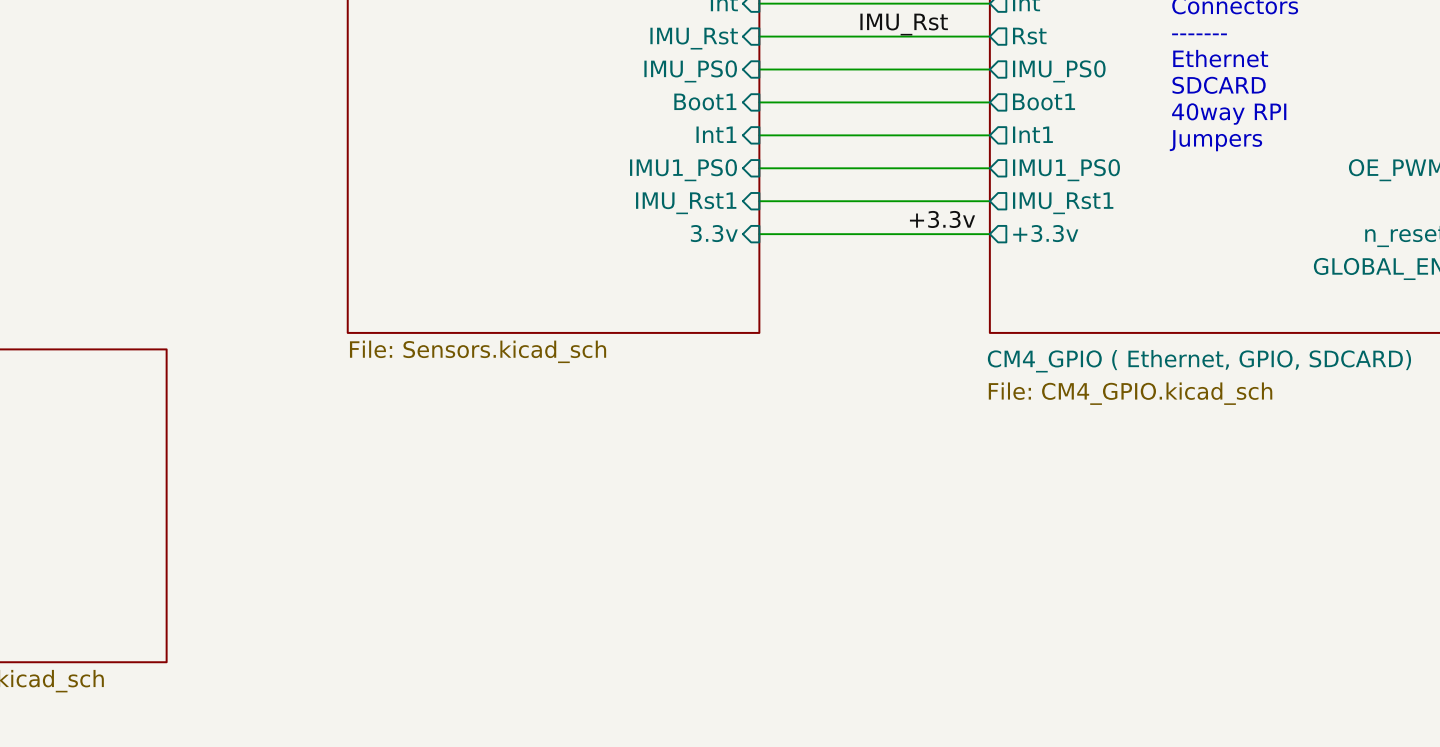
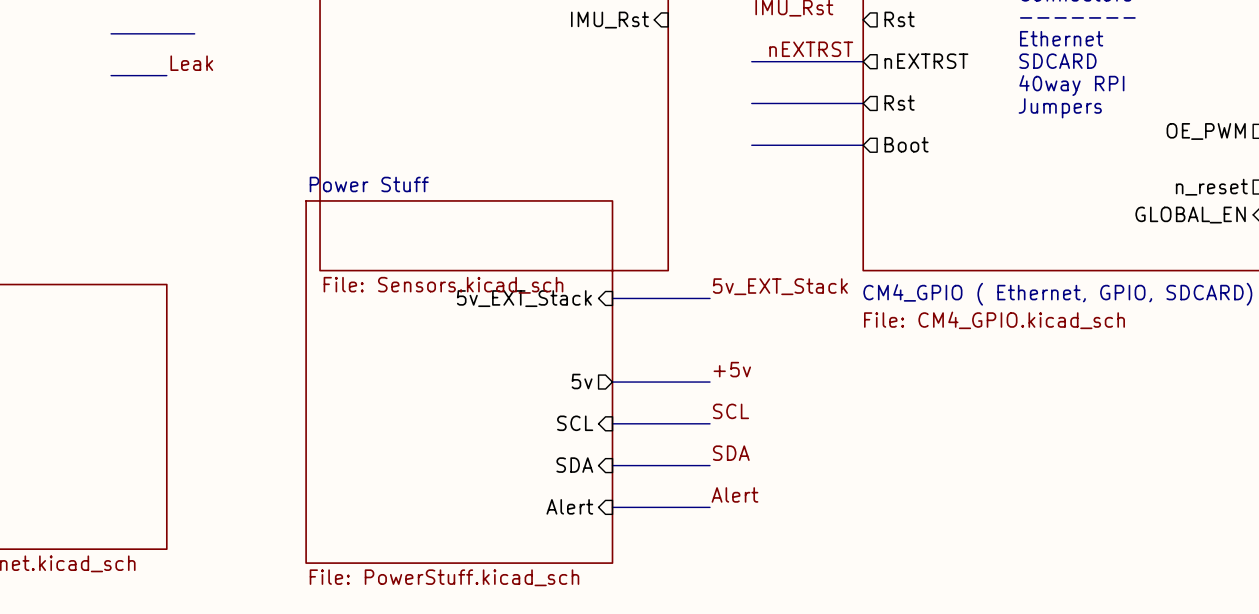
wire: (759, 36) (989, 36) -> none
wire: none -> (111, 33) (194, 33)
wire: (759, 69) (989, 69) -> none
sheet pin: IMU_PS0 (690, 71) -> none
label: none -> nEXTRST (811, 49)
sheet pin: IMU_PS0 (1059, 71) -> none
wire: none -> (751, 61) (863, 61)
sheet pin: none -> nEXTRST (926, 61)
label: none -> Leak (191, 63)
sheet pin: Boot1 (705, 101) -> none
sheet pin: Boot1 (1044, 101) -> none
wire: none -> (111, 75) (166, 75)
wire: (759, 102) (989, 102) -> none
sheet pin: Int1 (716, 134) -> none
sheet pin: Int1 (1032, 134) -> Rst (899, 102)
wire: (759, 135) (858, 135) -> none
wire: (759, 168) (989, 168) -> none
sheet pin: IMU1_PS0 (683, 170) -> none
sheet pin: IMU1_PS0 (1066, 170) -> none
wire: none -> (751, 145) (863, 145)
sheet pin: none -> Boot (906, 144)
wire: (759, 201) (989, 201) -> none
sheet pin: IMU_Rst1 (686, 203) -> none
sheet pin: IMU_Rst1 (1063, 203) -> none
label: +3.3v (942, 219) -> none
sheet pin: 3.3v (714, 233) -> none
sheet pin: +3.3v (1045, 233) -> none
wire: (759, 234) (989, 234) -> none
label: none -> 5v_EXT_Stack (780, 286)
wire: none -> (612, 298) (709, 298)
sheet pin: none -> 5v_EXT_Stack (524, 298)
label: none -> +5v (732, 369)
sheet Power Stuff: none -> File: PowerStuff.kicad_sch (459, 382)
sheet pin: none -> 5v (582, 381)
wire: none -> (612, 382) (709, 382)
label: none -> SCL (730, 411)
sheet pin: none -> SCL (575, 423)
wire: none -> (612, 423) (709, 423)
label: none -> SDA (731, 453)
sheet pin: none -> SDA (574, 465)
wire: none -> (612, 465) (709, 465)
label: none -> Alert (734, 494)
sheet pin: none -> Alert (569, 506)
wire: none -> (612, 507) (709, 507)

